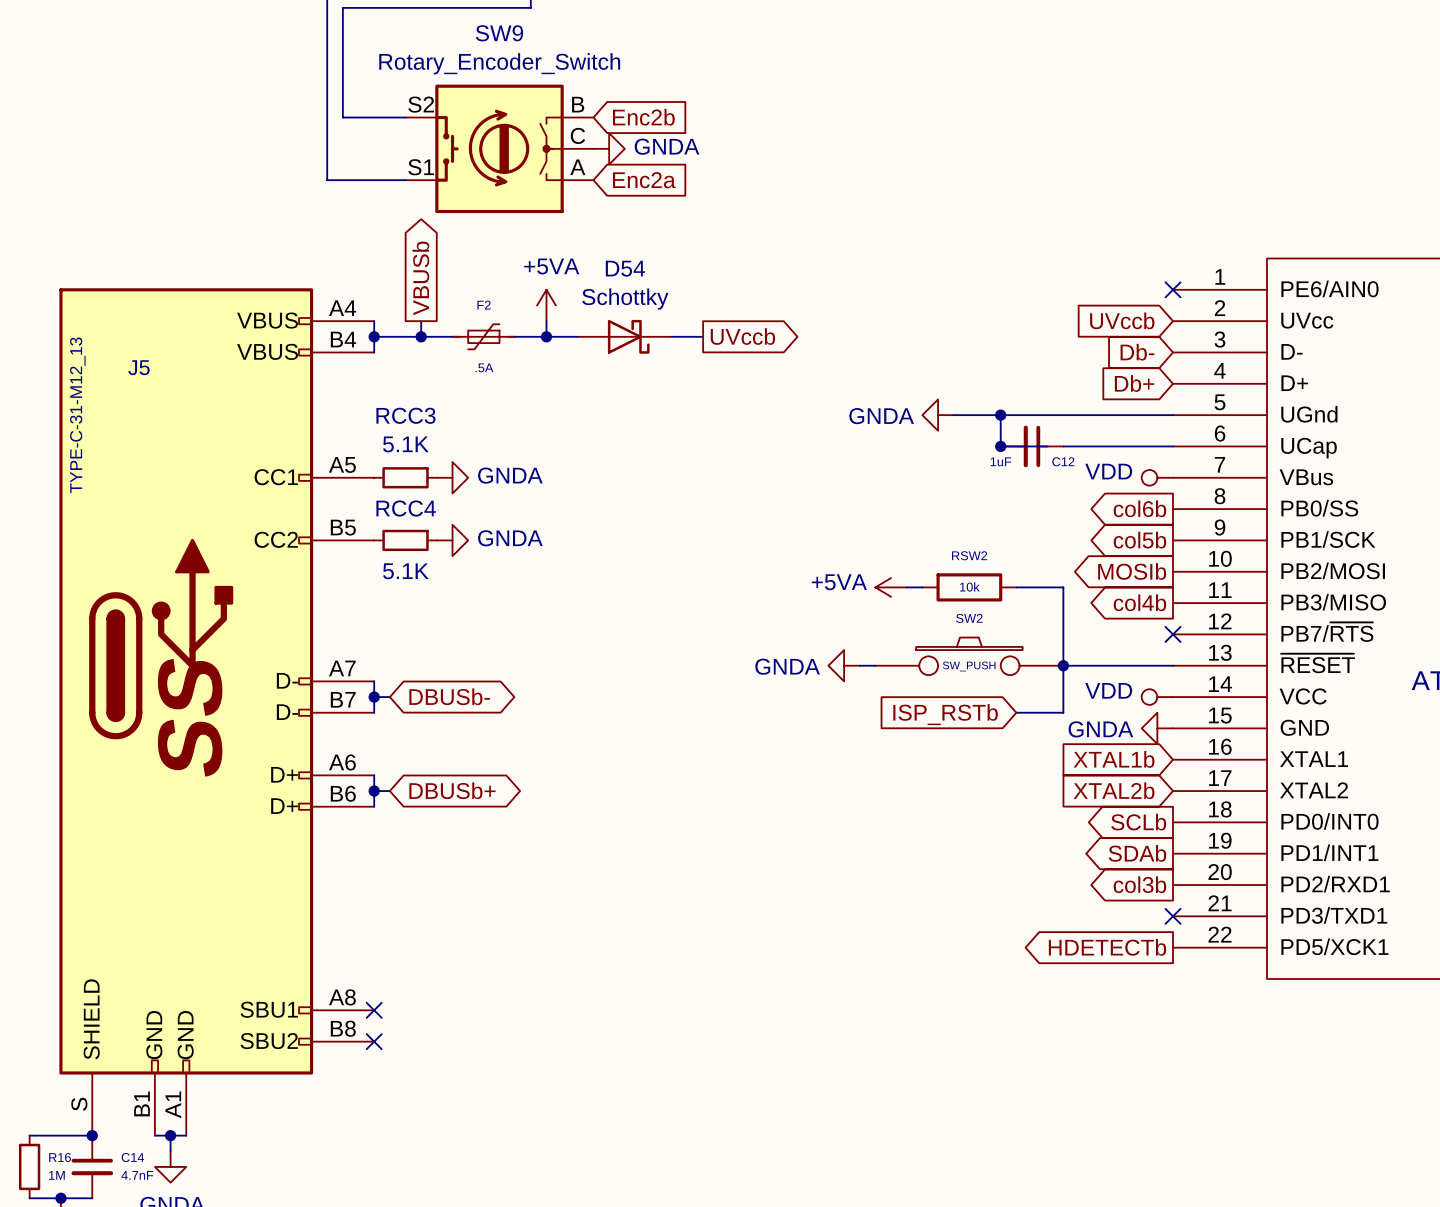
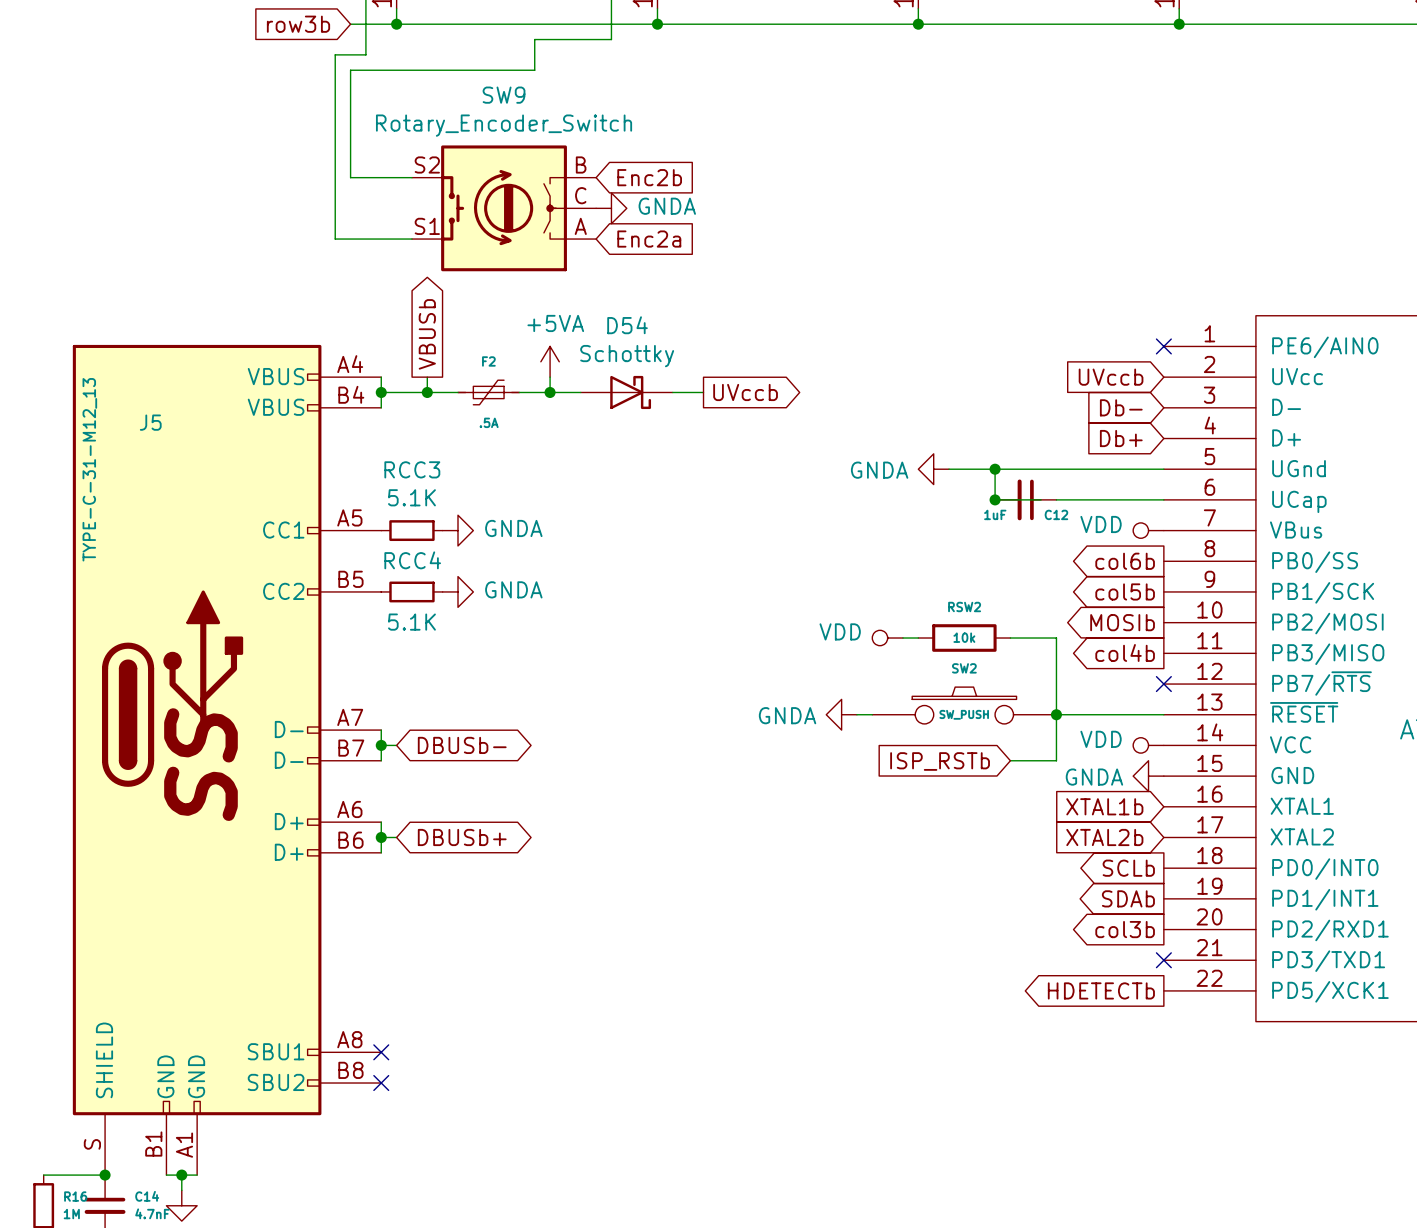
power symbol: +5VA (891, 587) -> VDD (887, 638)

